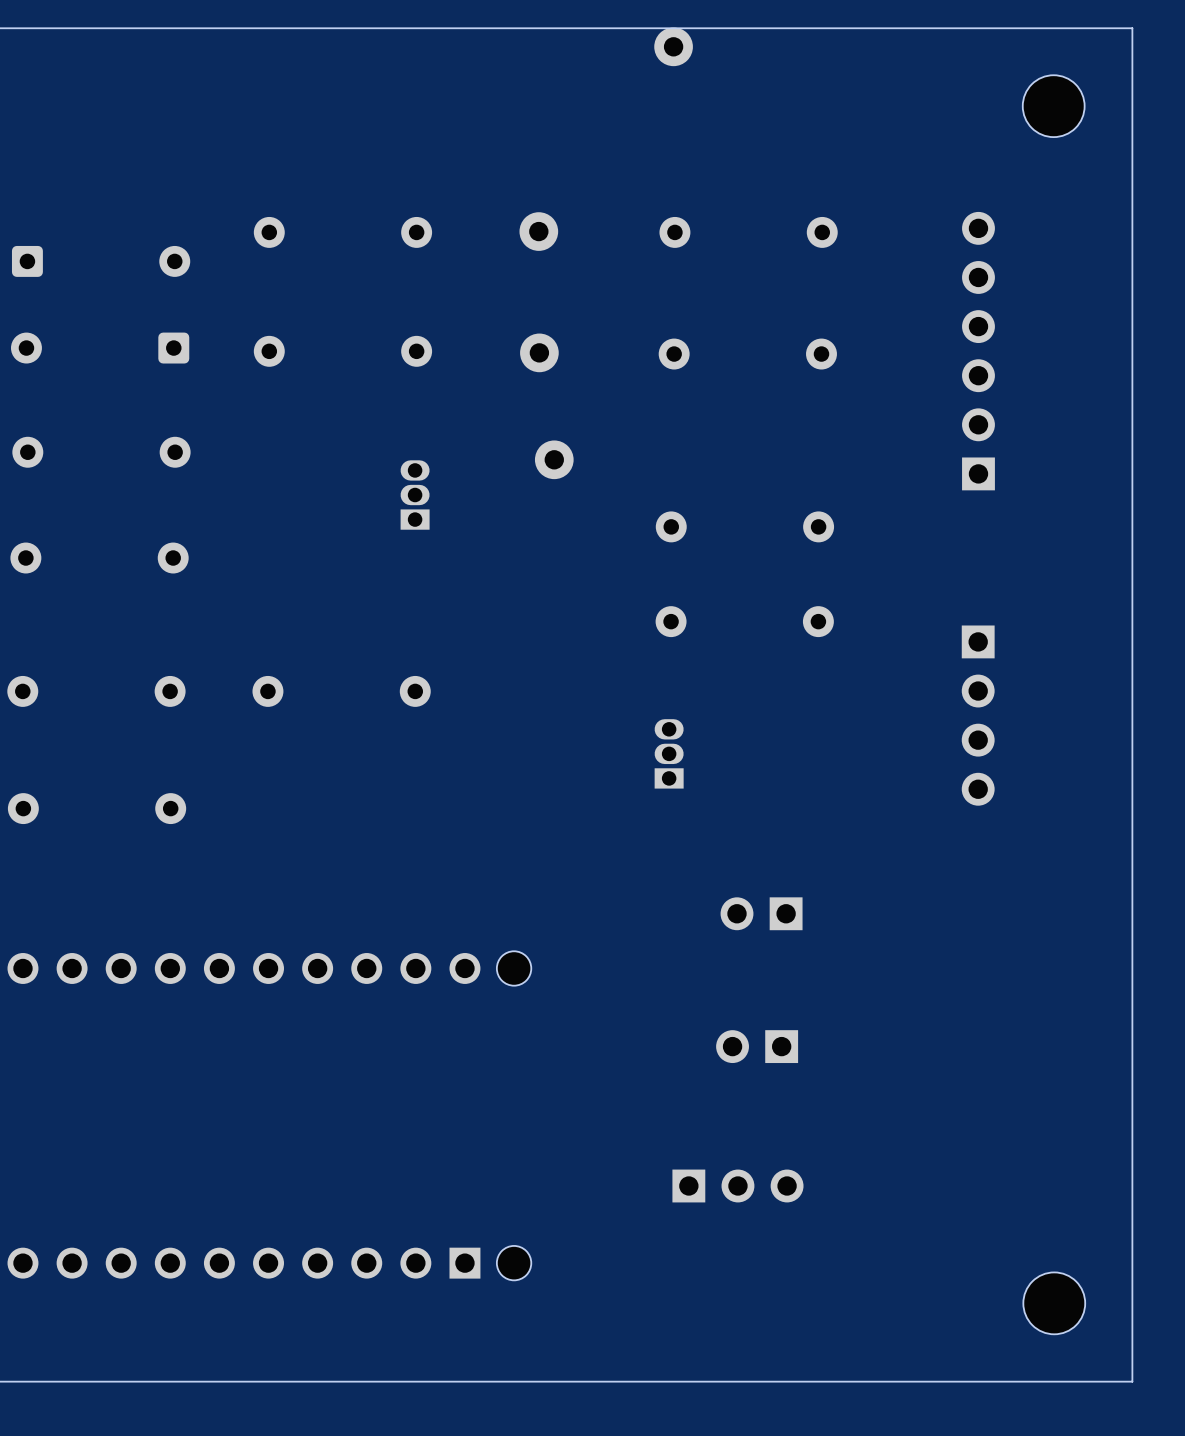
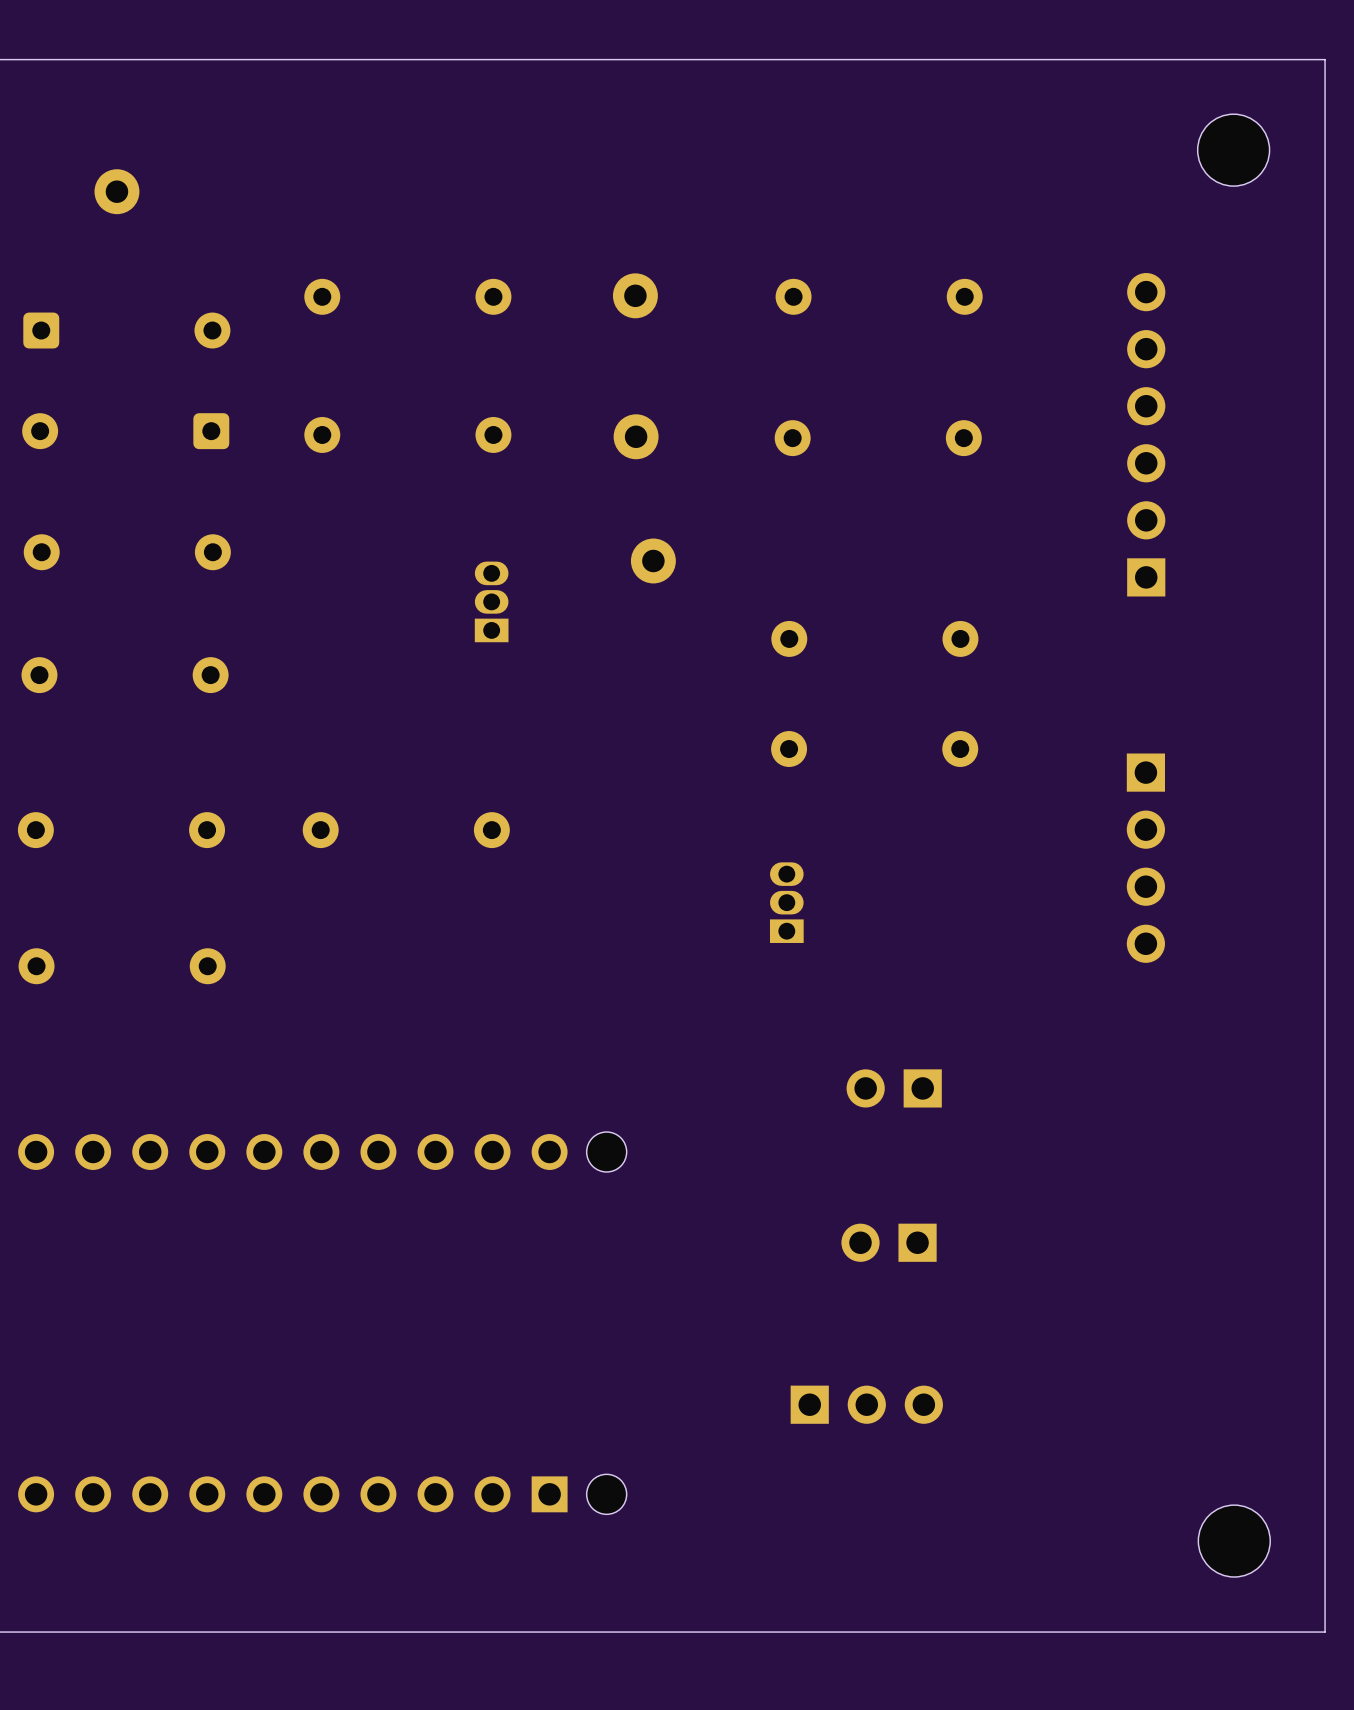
part: (673, 46) -> none
part: none -> (116, 191)

